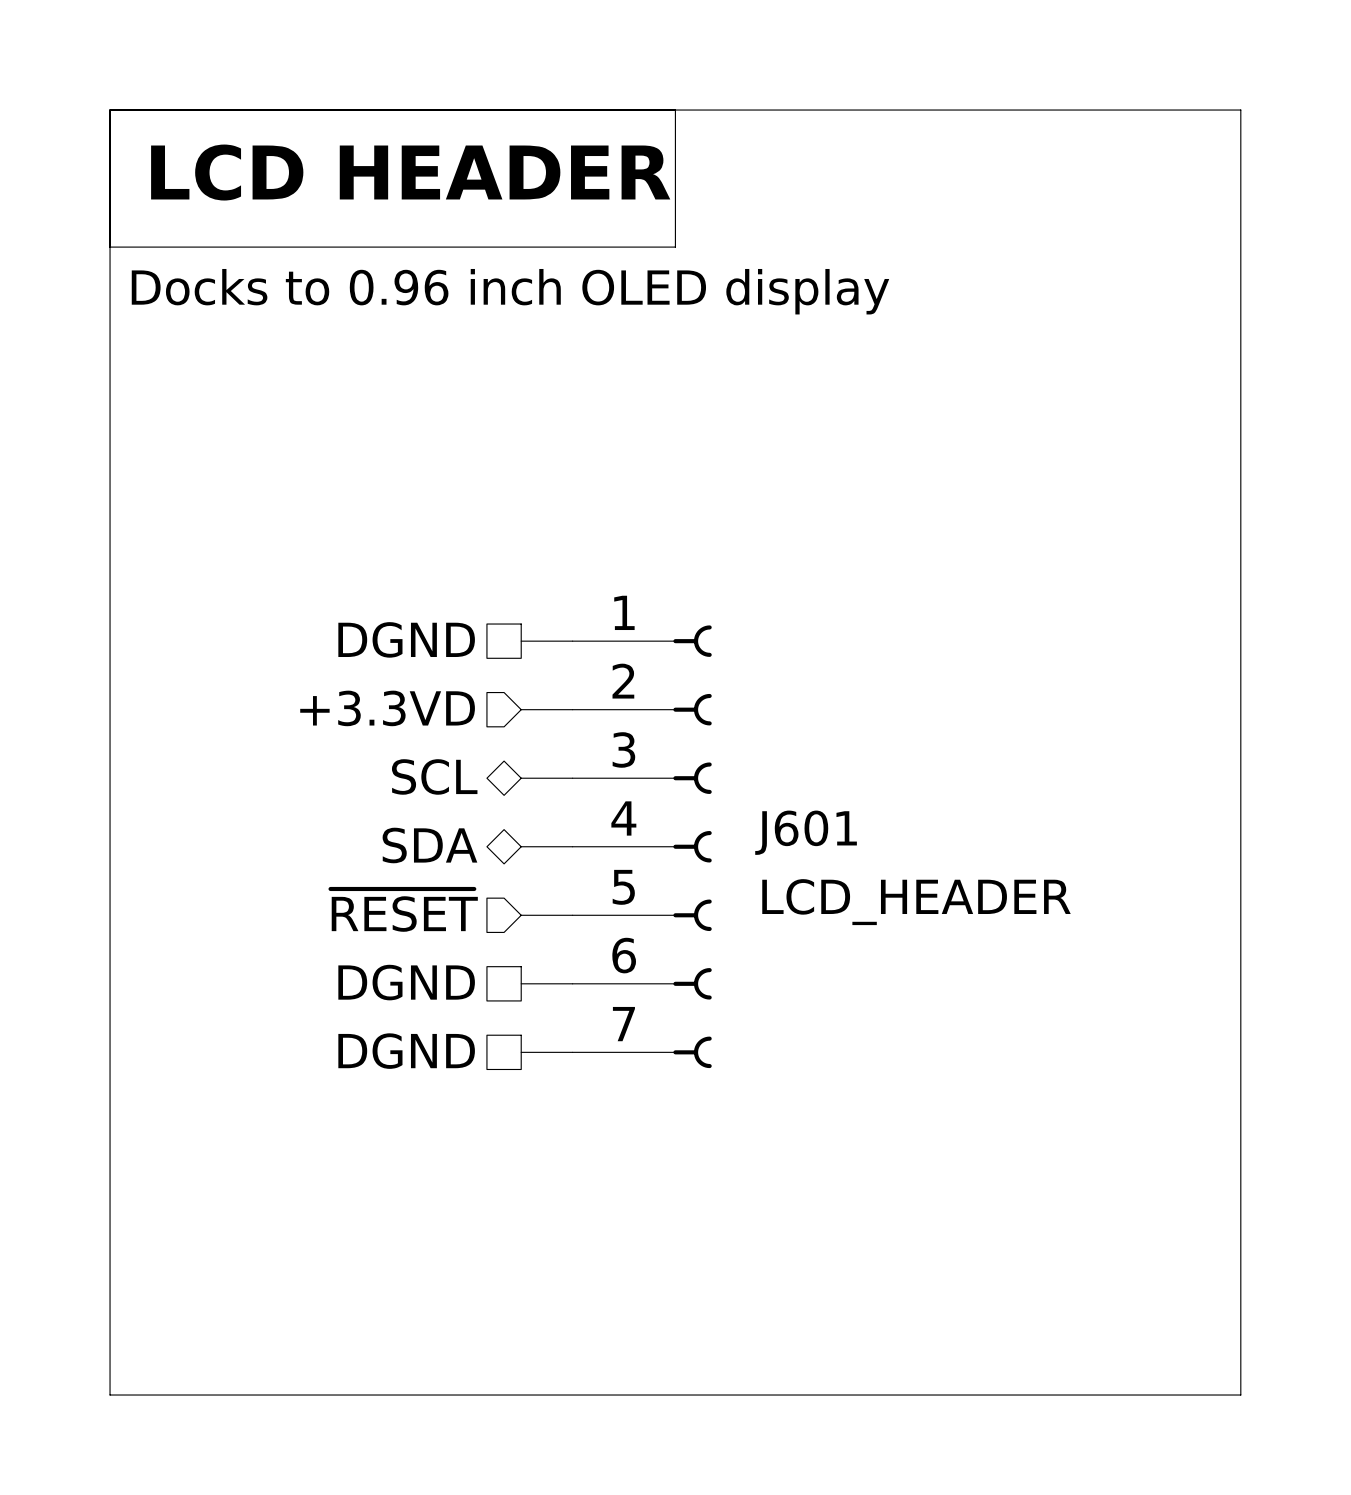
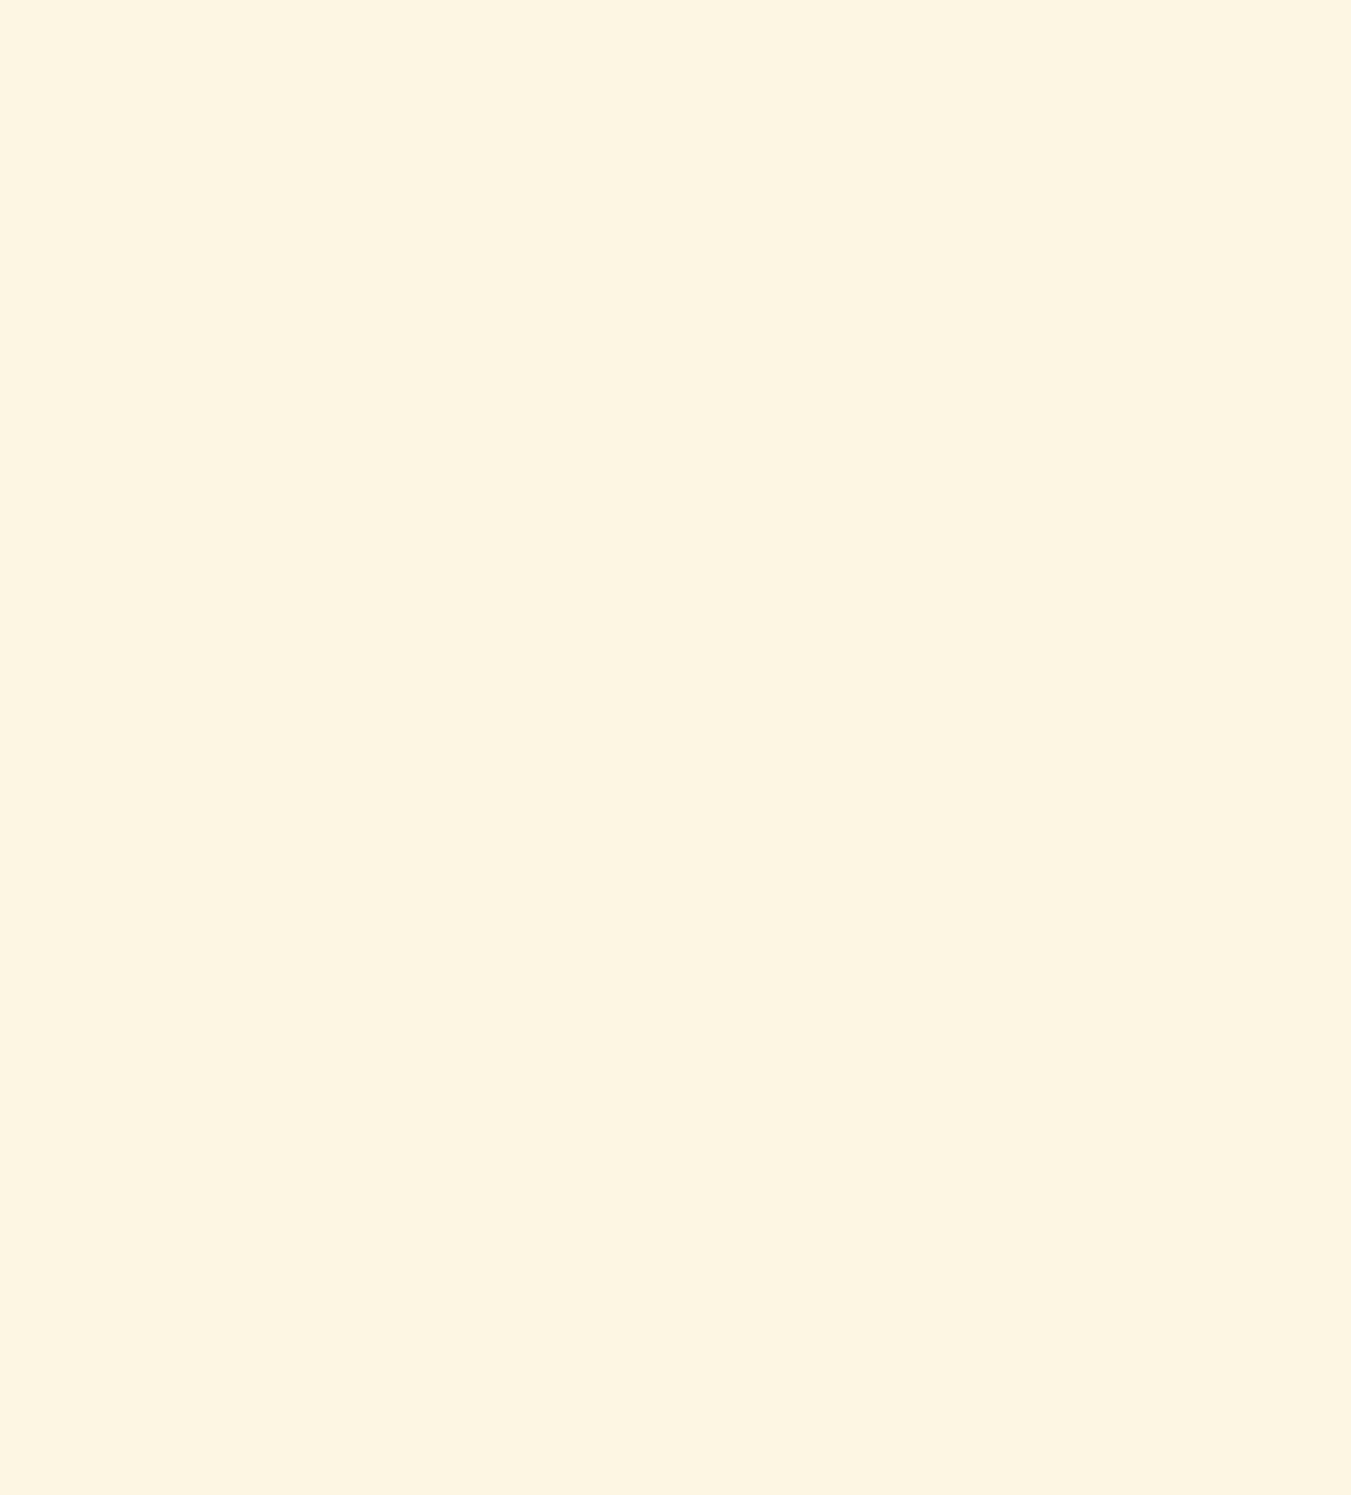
line: (110, 110) (1240, 110) (1240, 1395) (110, 1395) (110, 110) -> none
line: (675, 110) (675, 247) (110, 247) -> none
text: LCD HEADER (410, 172) -> none
text: Docks to 0.96 inch OLED display (510, 291) -> none
hierarchical label: DGND (406, 639) -> none
wire: (521, 641) (572, 641) -> none
hierarchical label: +3.3VD (387, 708) -> none
wire: (521, 709) (572, 709) -> none
hierarchical label: SCL (434, 776) -> none
wire: (521, 778) (572, 778) -> none
hierarchical label: SDA (429, 845) -> none
wire: (521, 846) (572, 846) -> none
J601: LCD_HEADER (642, 846) -> none
hierarchical label: ~{RESET} (404, 910) -> none
wire: (521, 915) (572, 915) -> none
hierarchical label: DGND (406, 982) -> none
wire: (521, 983) (572, 983) -> none
hierarchical label: DGND (406, 1051) -> none
wire: (521, 1052) (572, 1052) -> none

